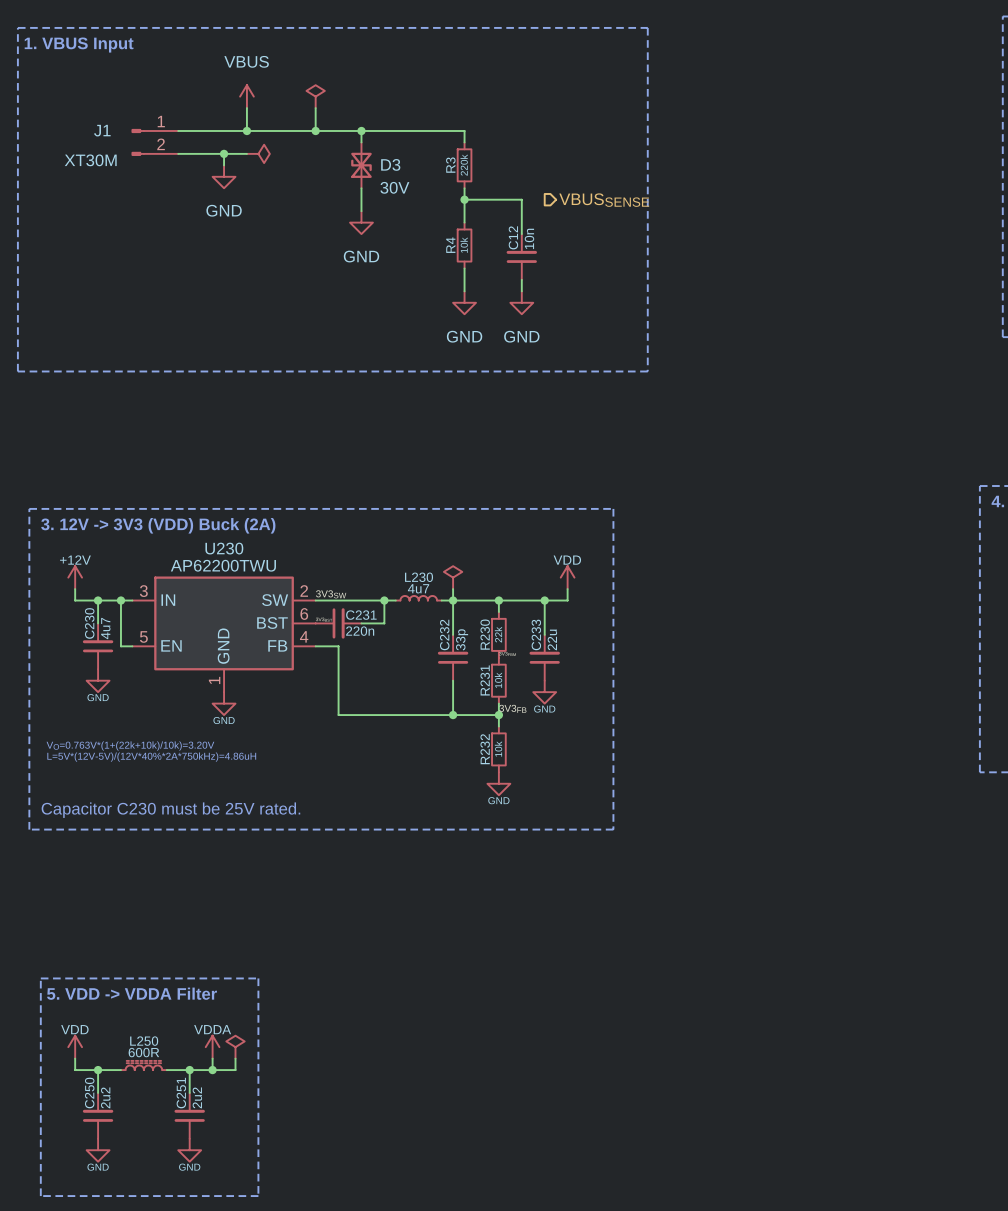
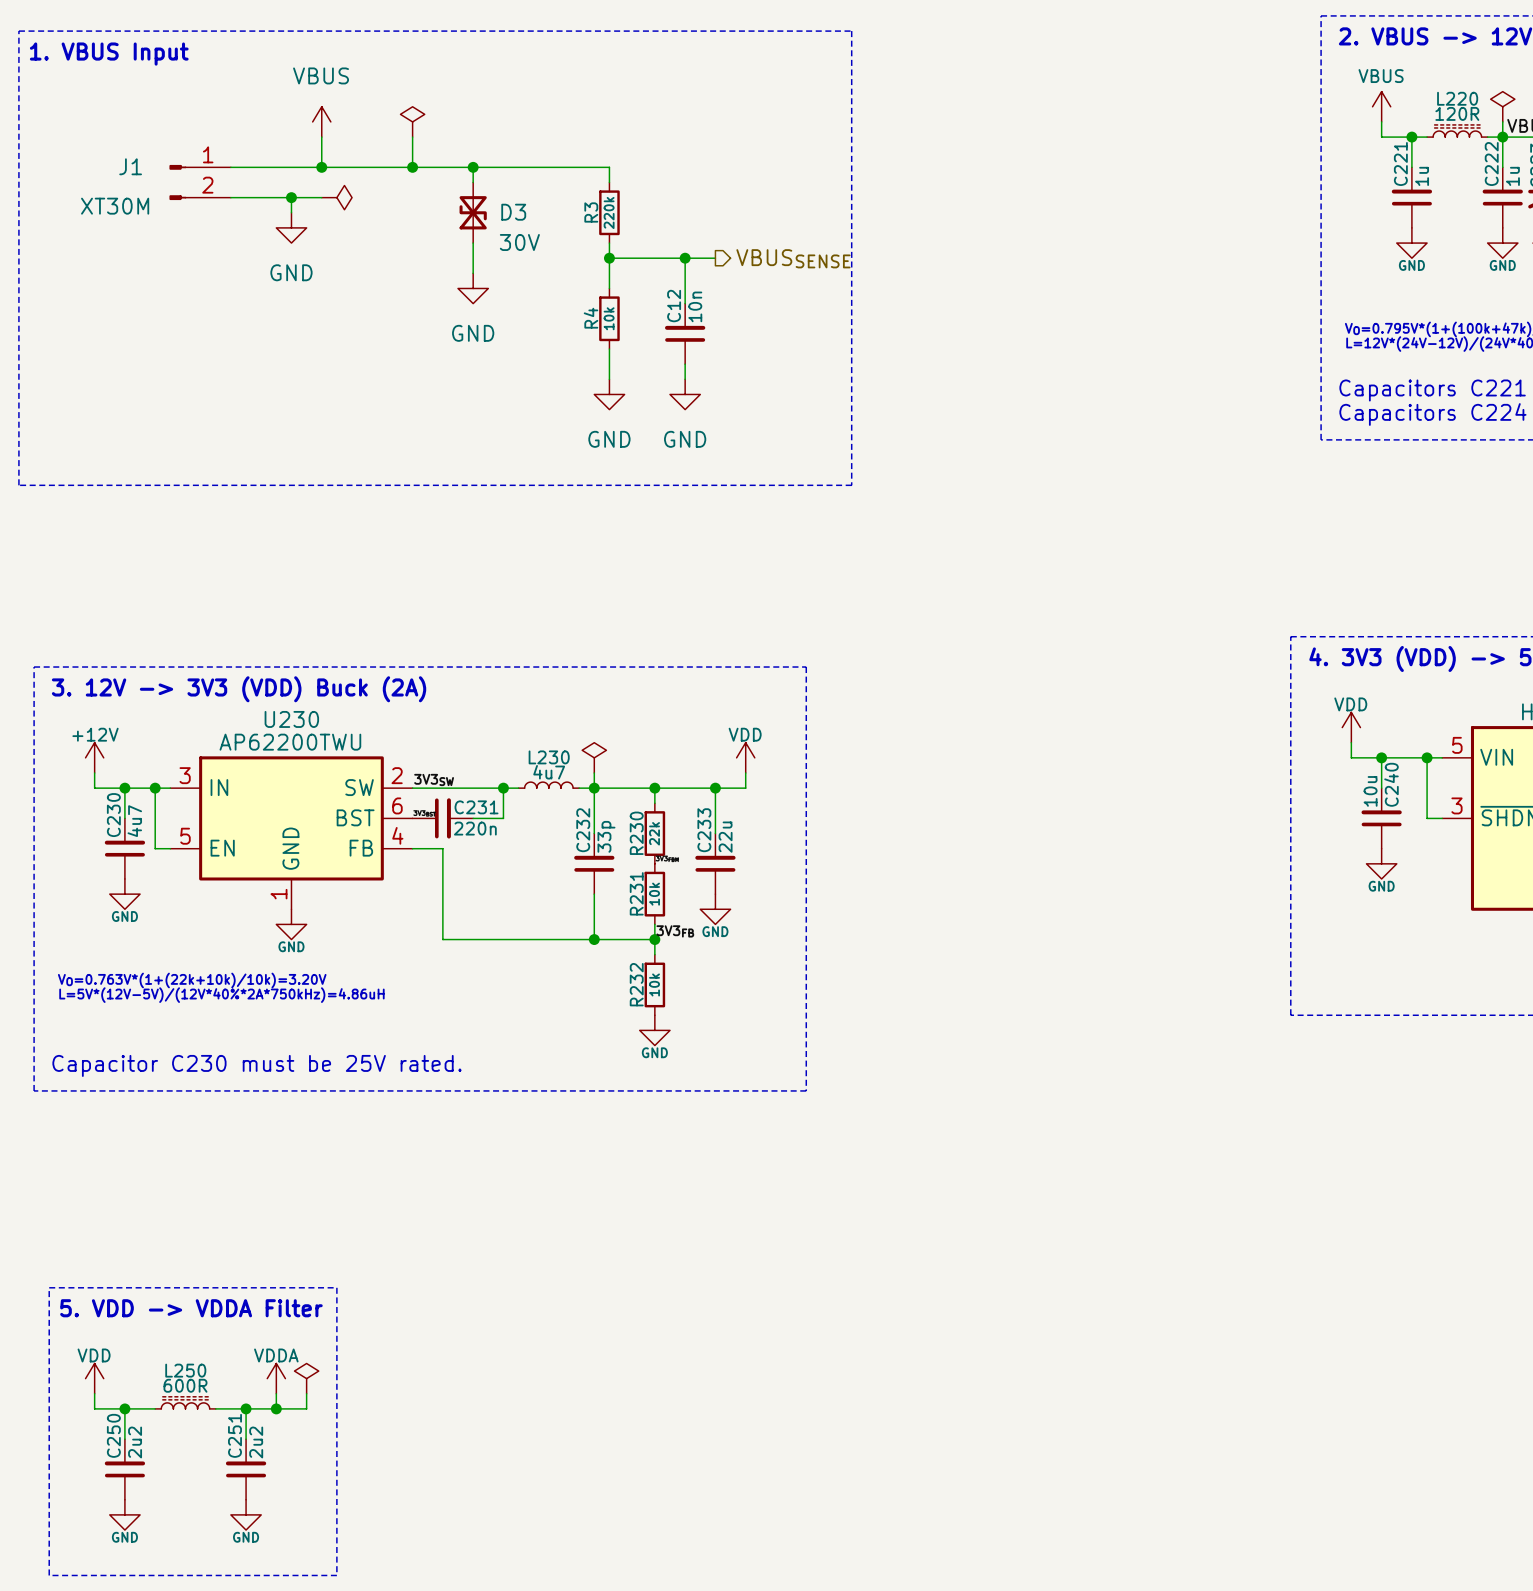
wire: none -> (685, 258) (715, 258)
junction: none -> (685, 258)

